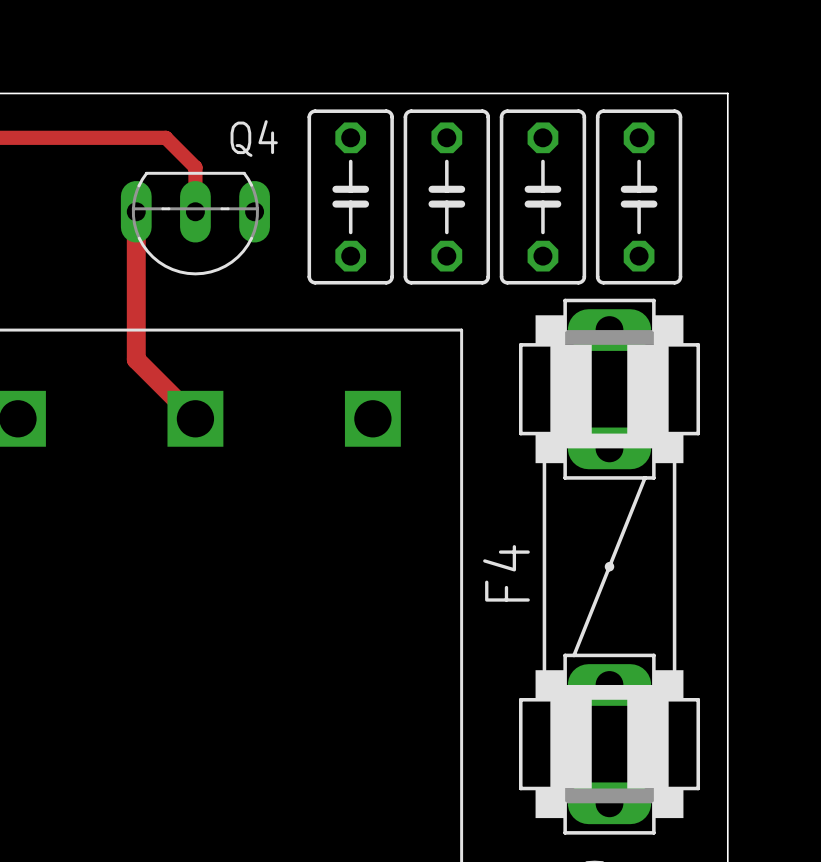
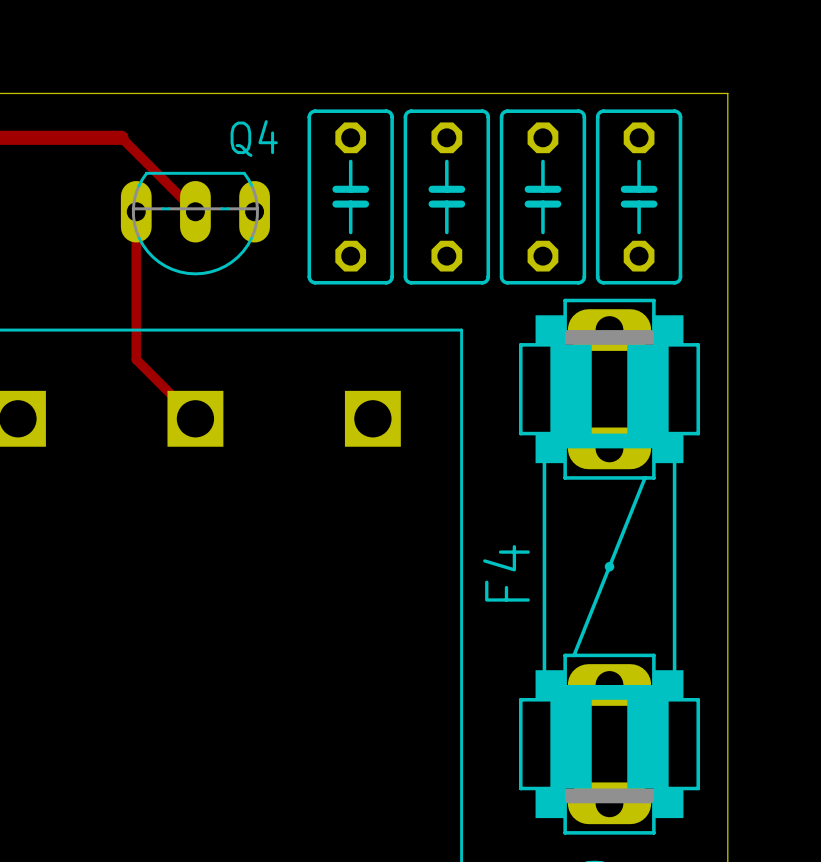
track: (121, 137) (165, 137) (195, 167) (195, 211) -> (121, 137) (195, 211)
track width: thick (136, 211) (136, 359) (195, 418) -> thin (136, 211) (136, 359) (195, 418)

